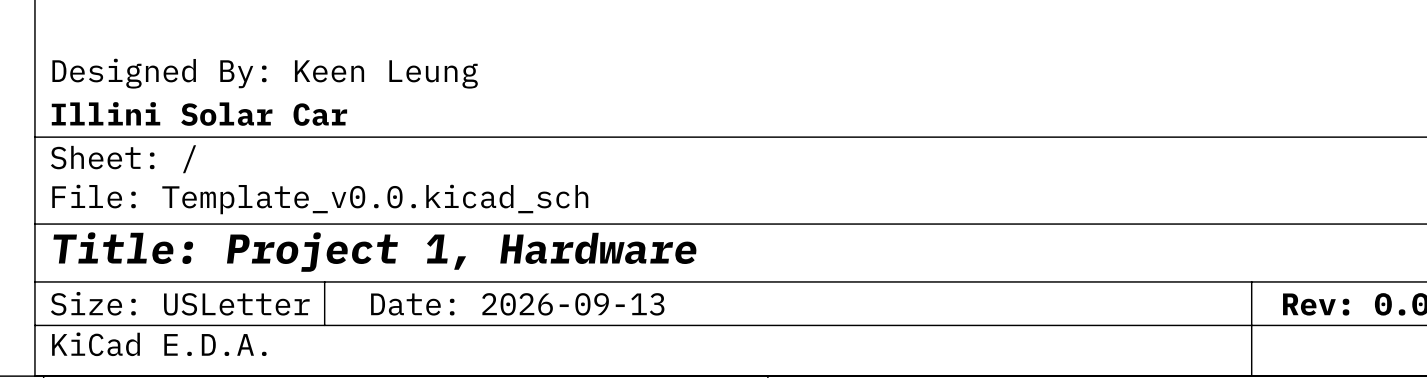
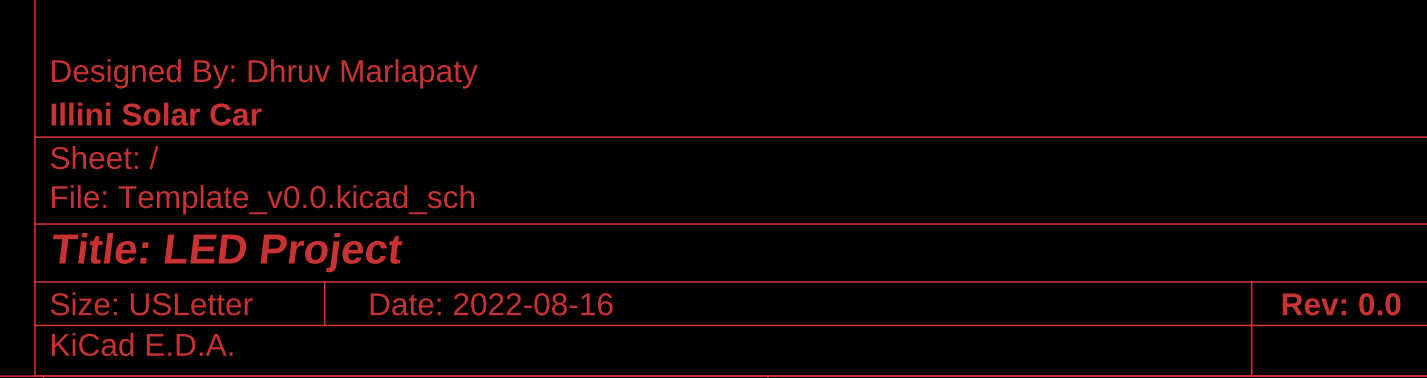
title block: Designed By: Keen Leung (265, 73) -> Designed By: Dhruv Marlapaty (264, 73)
title block: Title: Project 1, Hardware (375, 252) -> Title: LED Project (227, 252)
title block: Date: 2026-09-13 (517, 304) -> Date: 2022-08-16 (491, 304)

